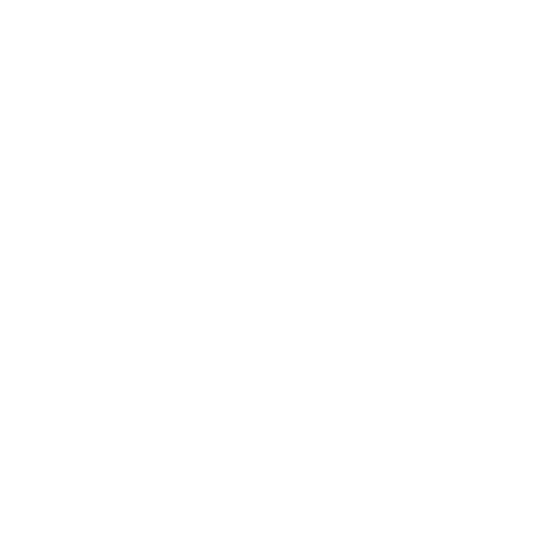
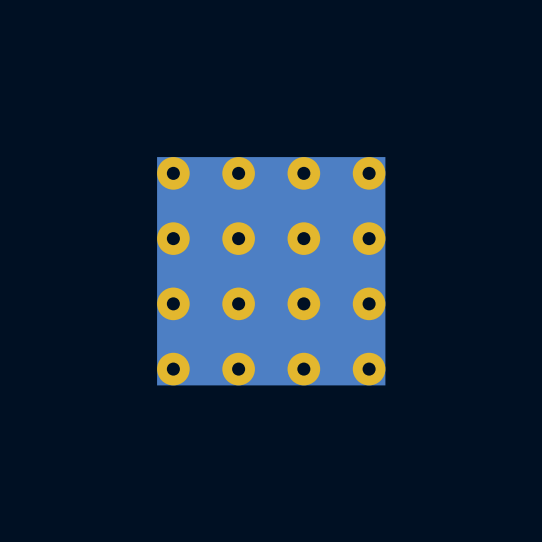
part: none -> (271, 271)

